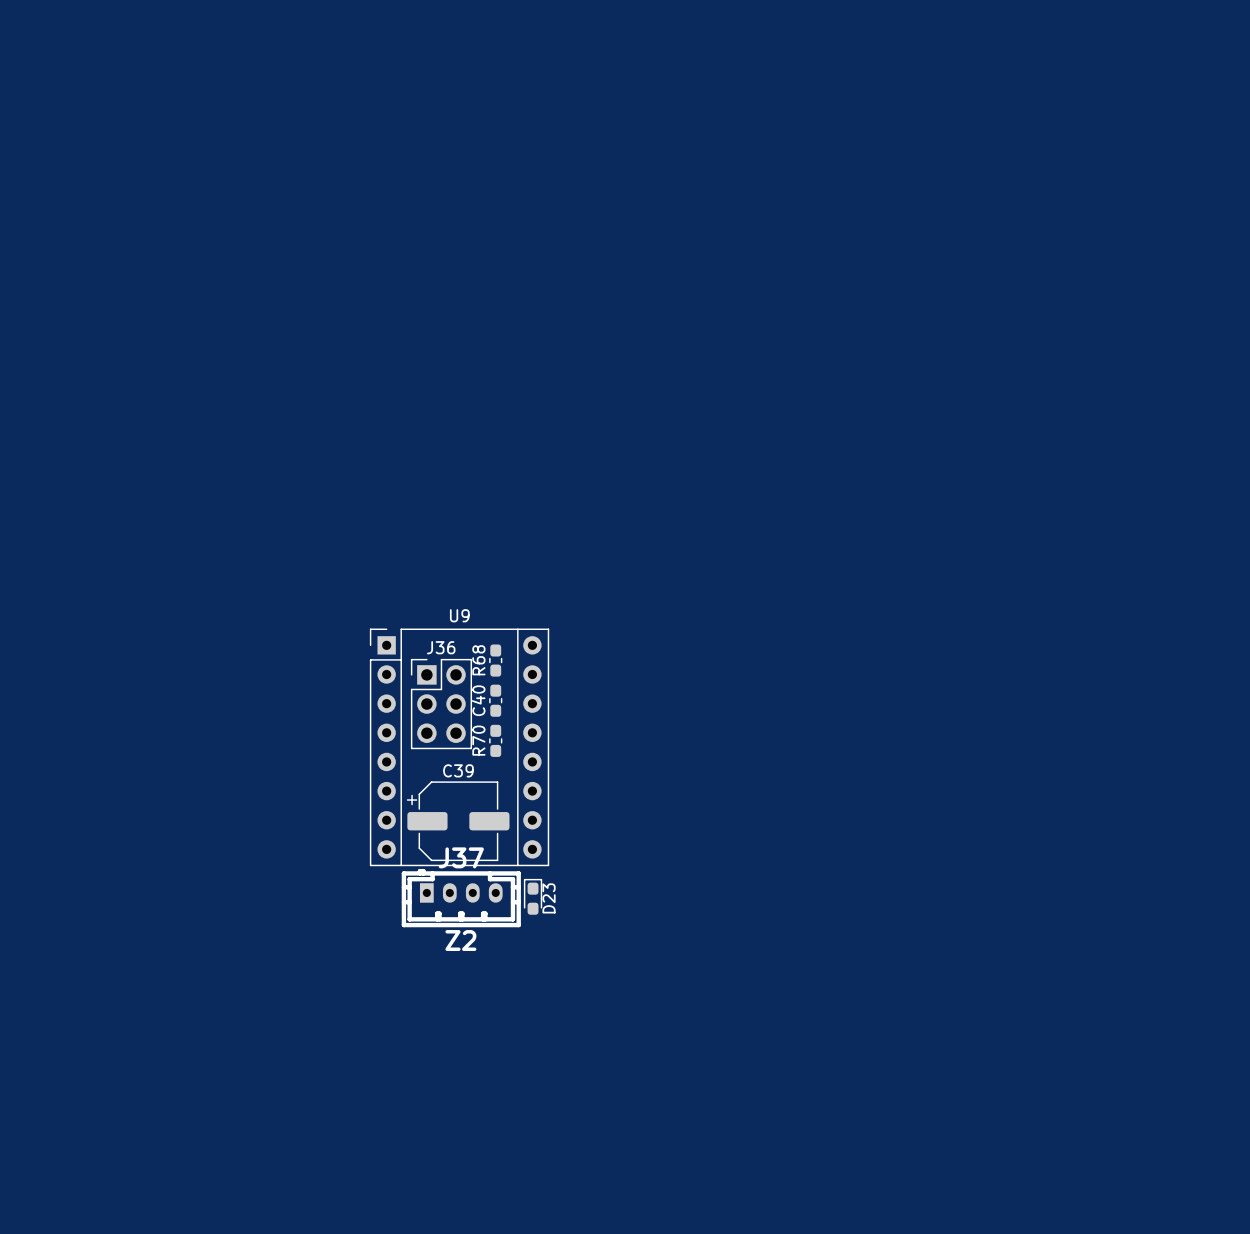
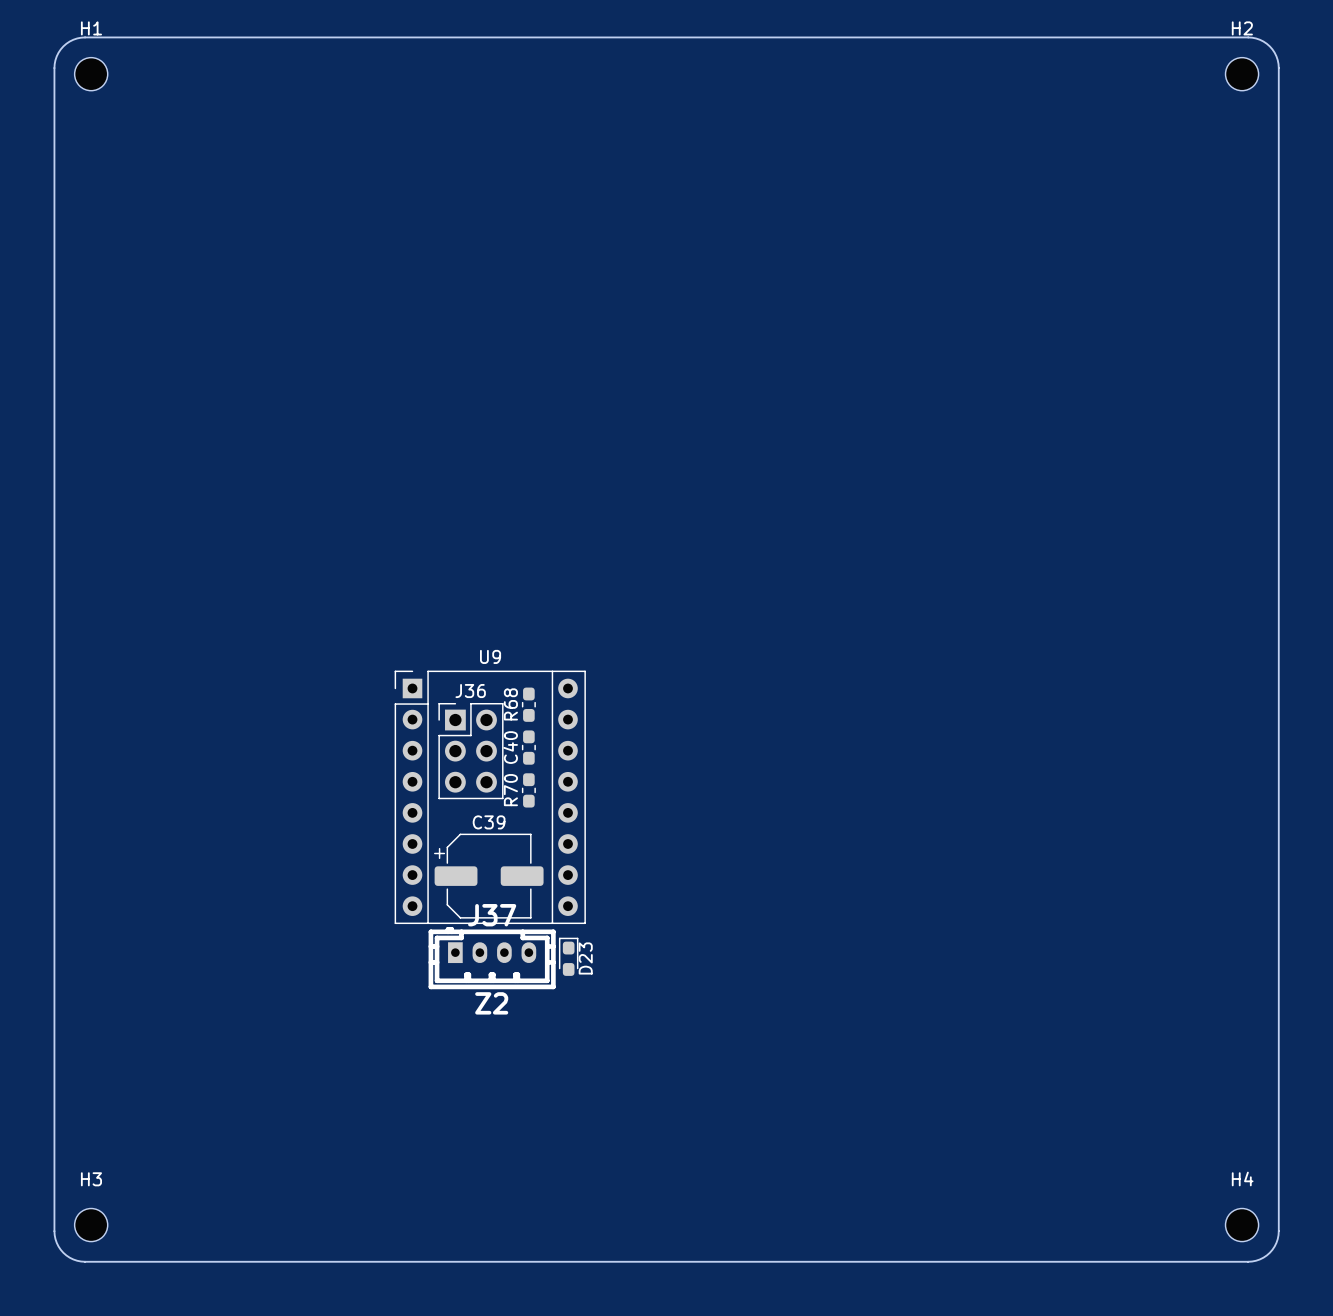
board edge: none -> (85, 37) (1248, 37) (1259, 39) (1269, 46) (1276, 56) (1278, 68) (1278, 1231) (1276, 1242) (1269, 1252) (1259, 1259) (1248, 1261) (85, 1261) (73, 1259) (63, 1252) (56, 1242) (54, 1231) (54, 68) (56, 56) (63, 46) (73, 39) (85, 37)
H1: none -> (91, 74)
H2: none -> (1242, 74)
H3: none -> (91, 1225)
H4: none -> (1242, 1225)

